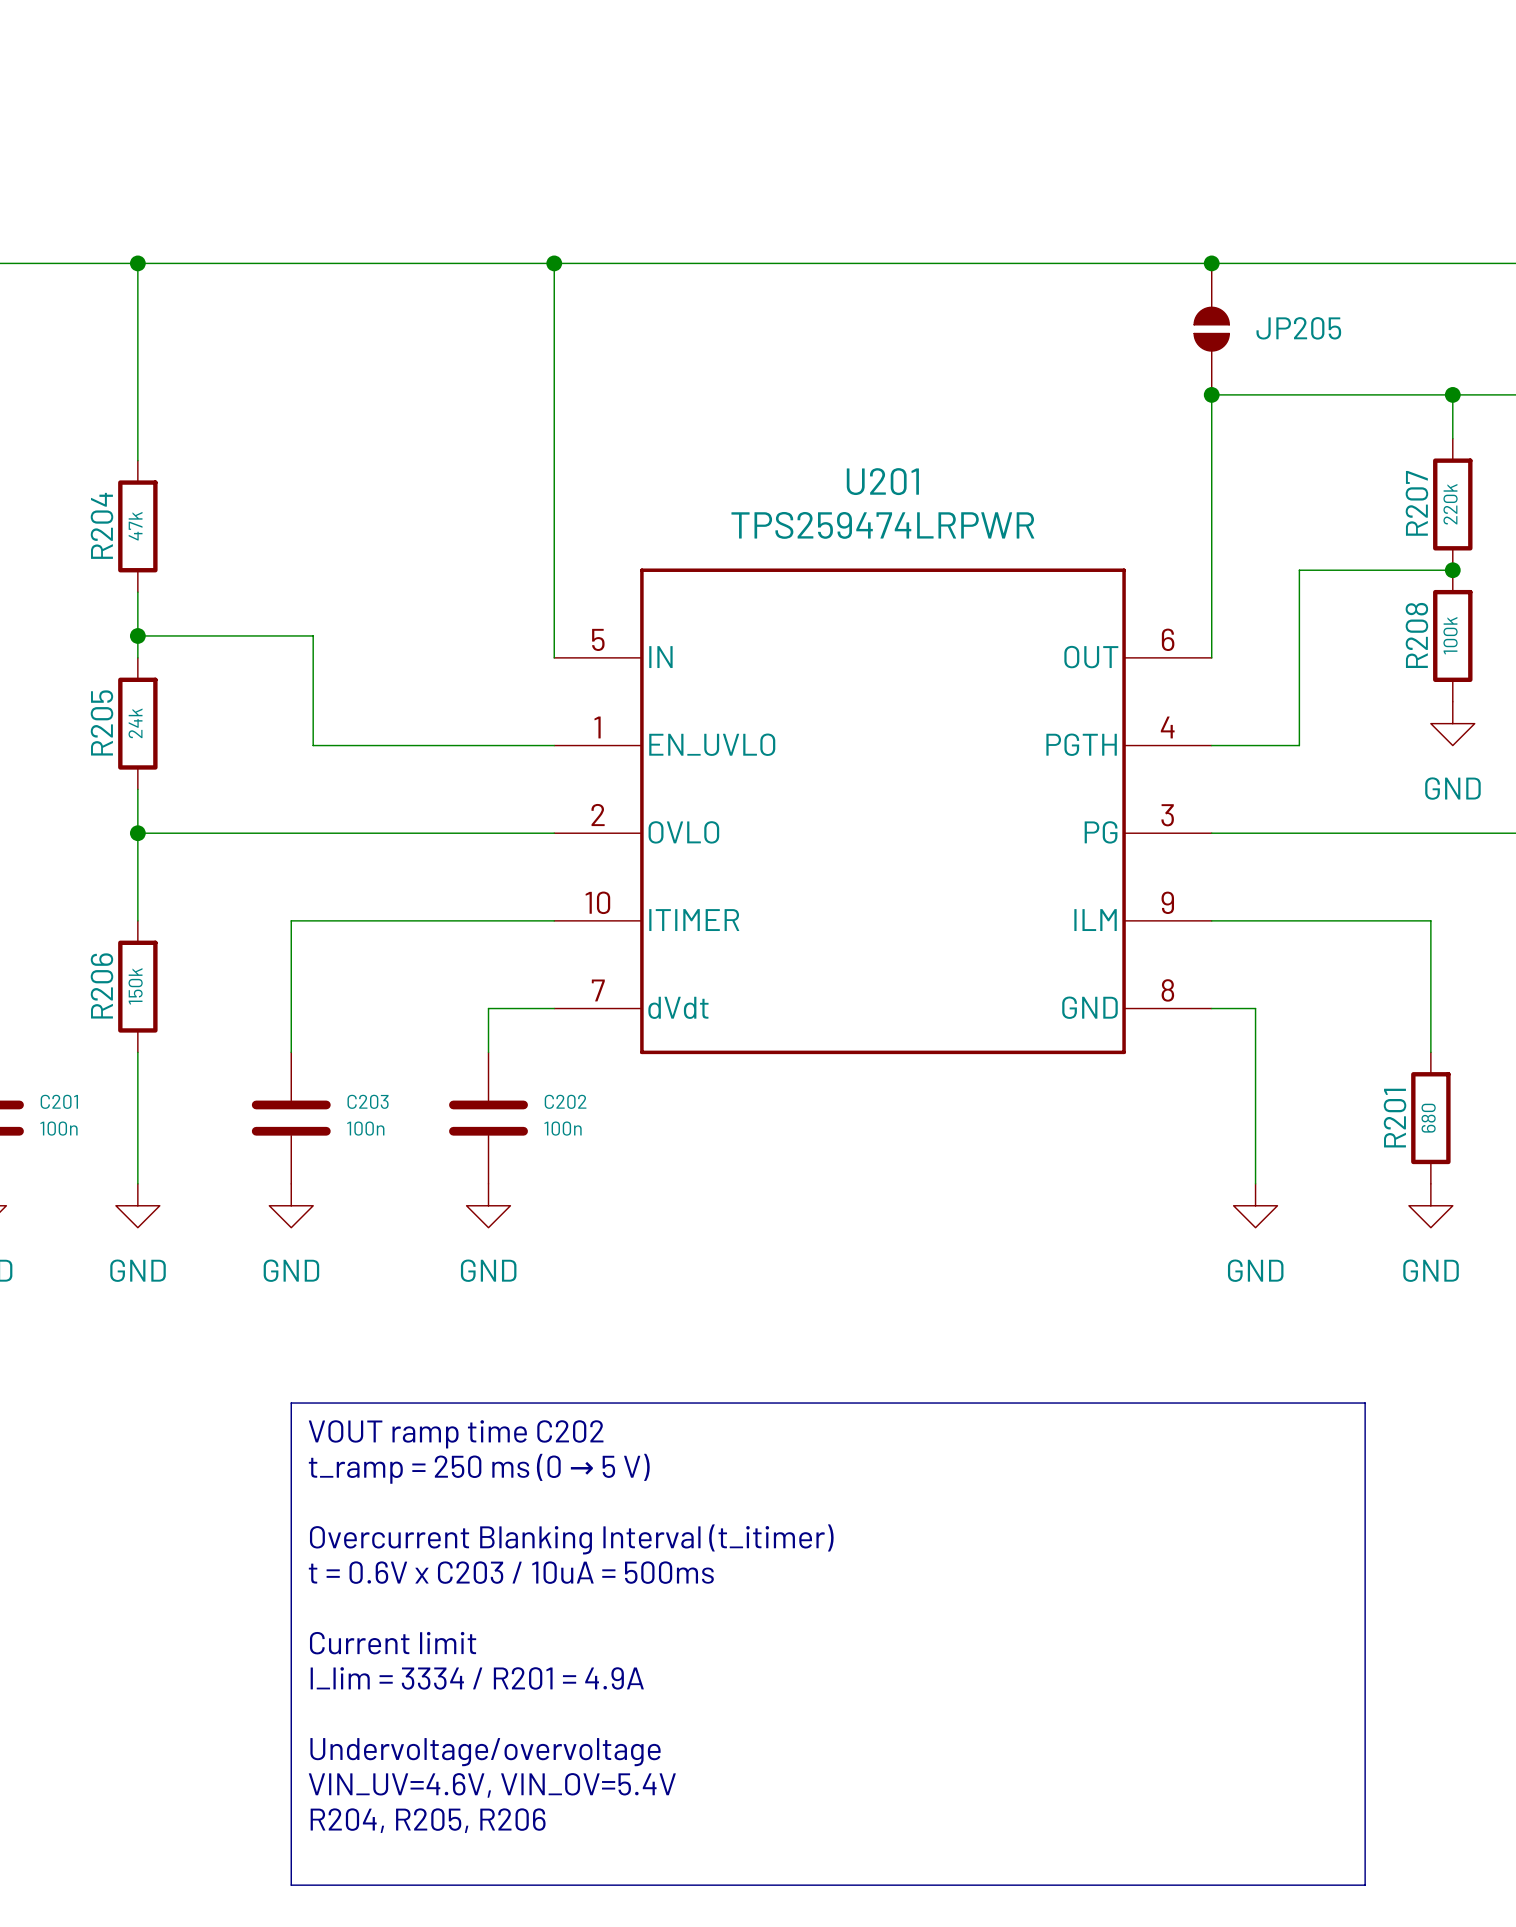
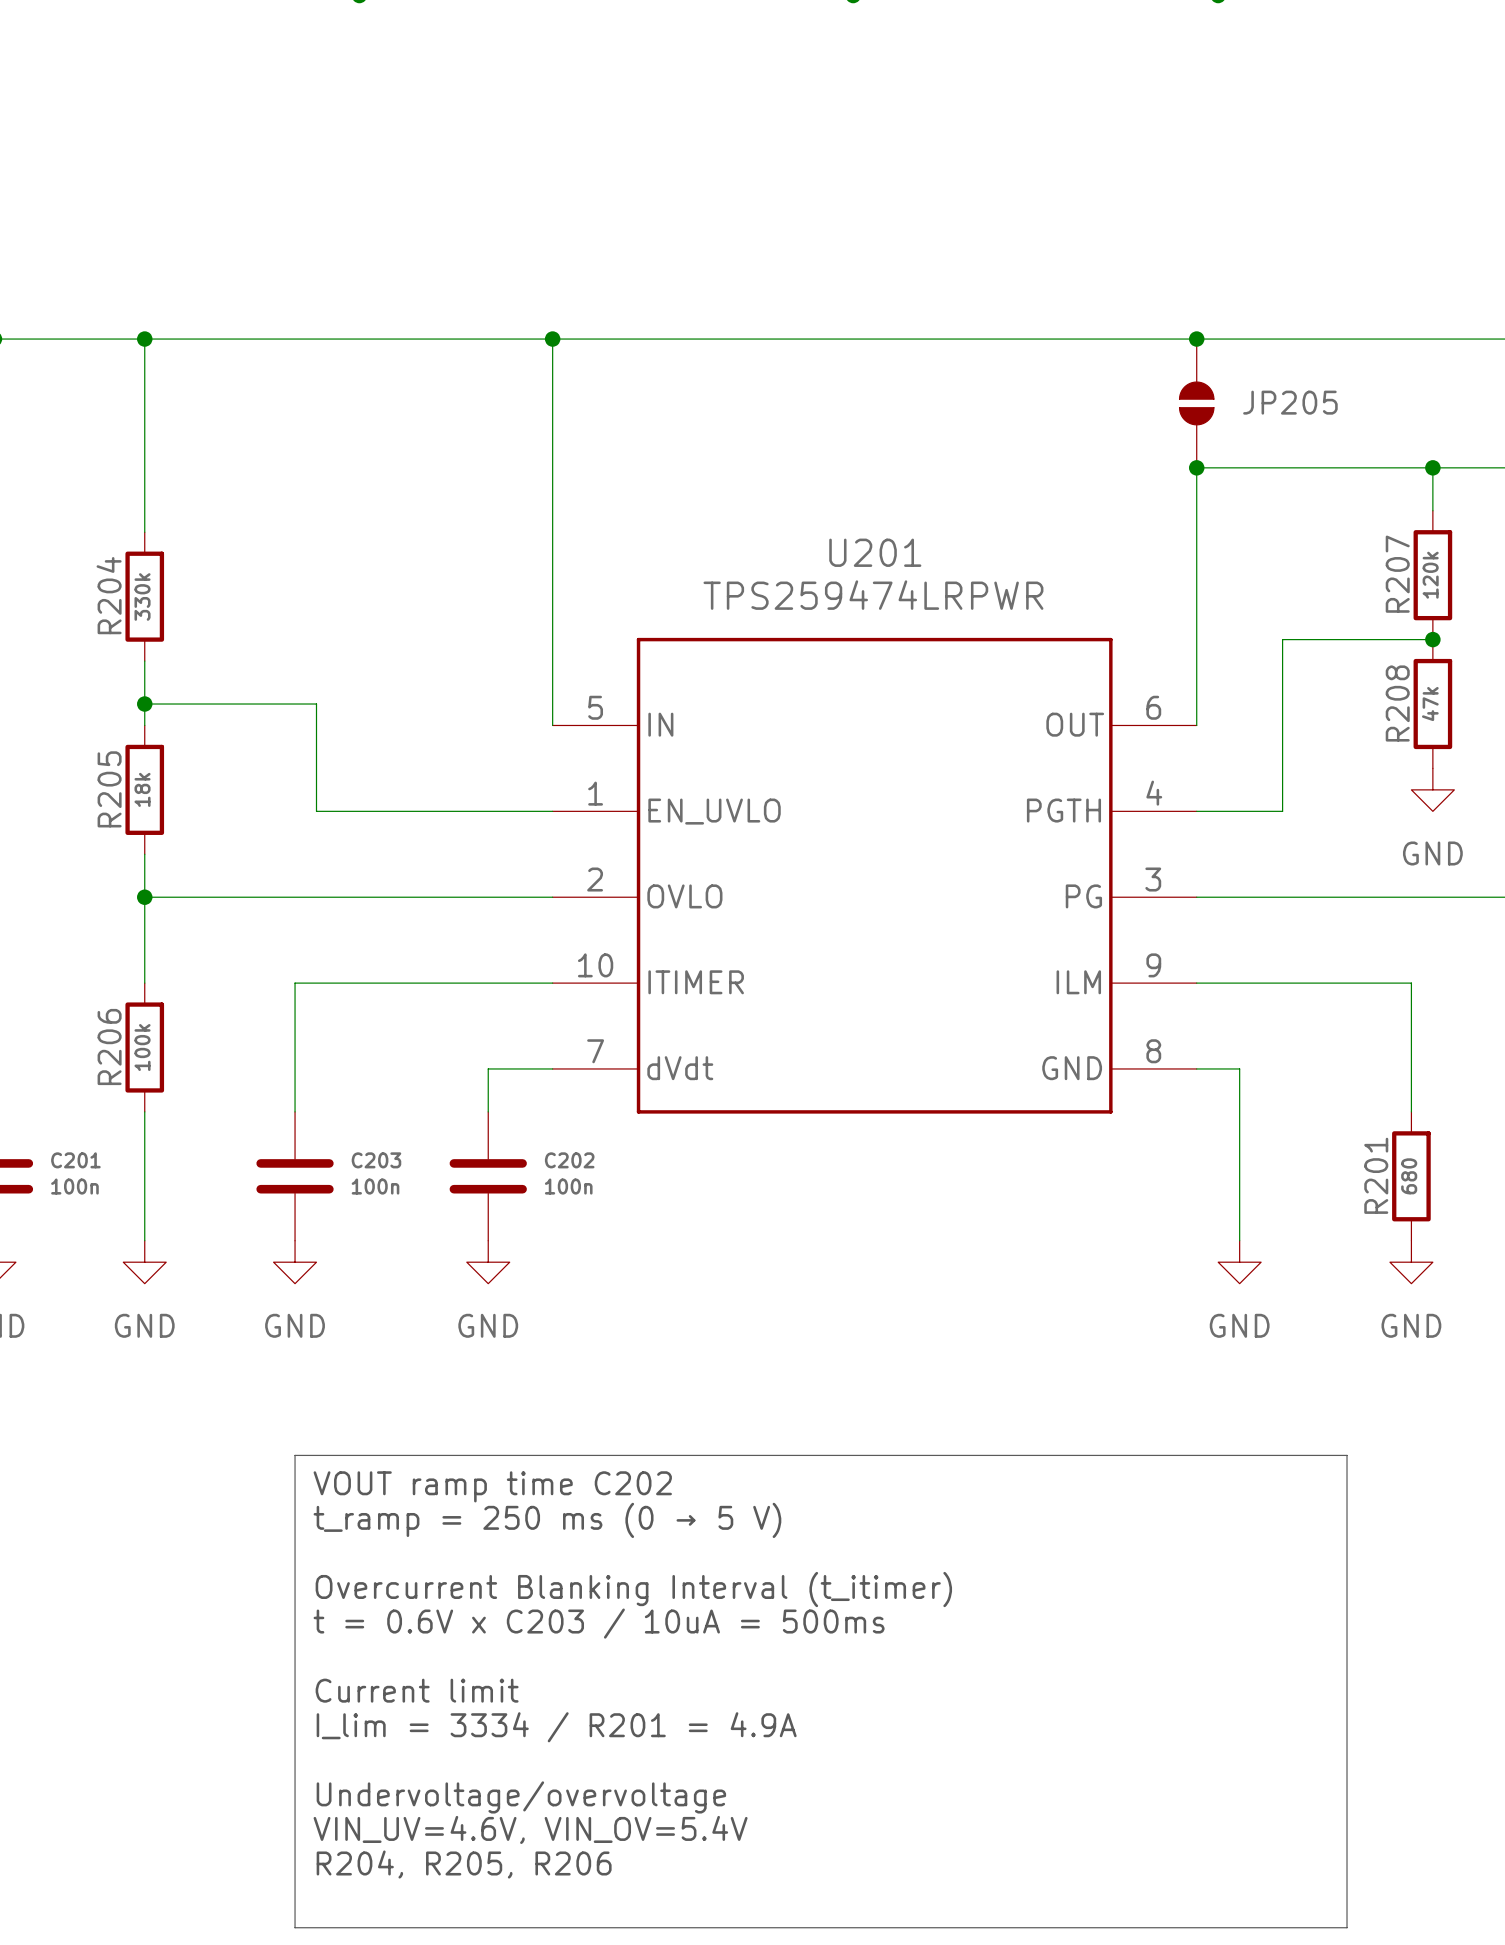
R207 value: 220k (1450, 504) -> 120k (1430, 575)
R204 value: 47k (135, 526) -> 330k (142, 596)
R208 value: 100k (1450, 635) -> 47k (1430, 704)
R205 value: 24k (135, 723) -> 18k (142, 789)
R206 value: 150k (135, 986) -> 100k (142, 1047)

